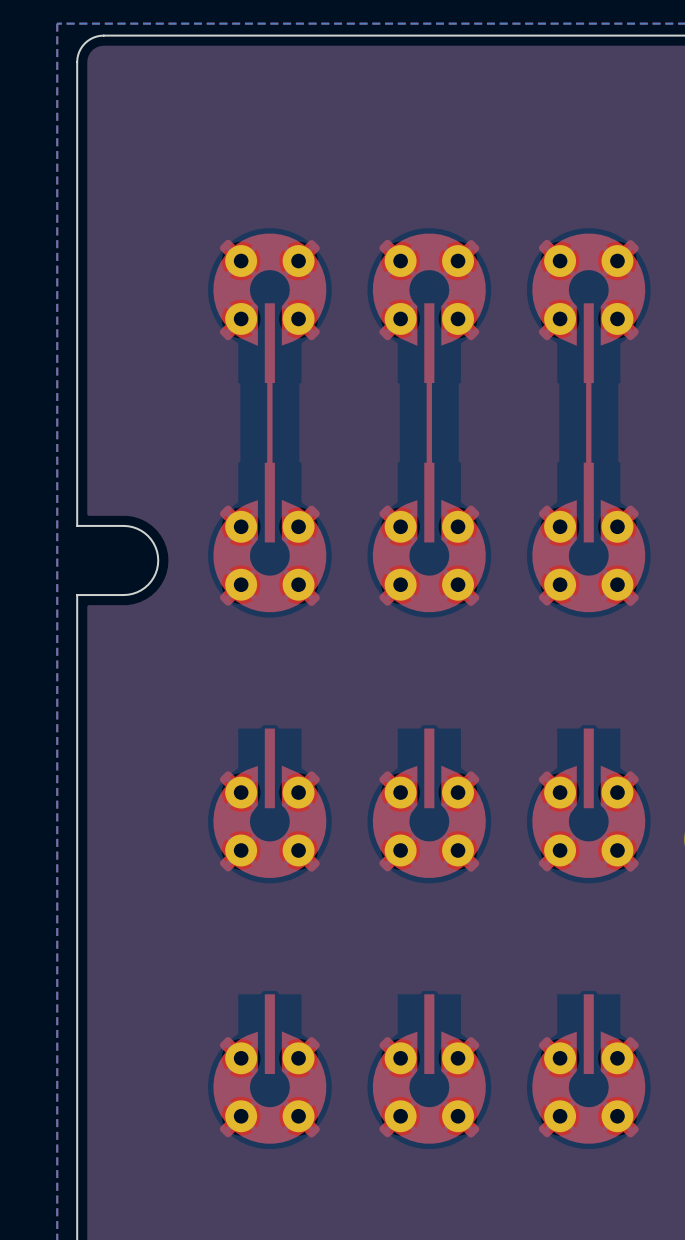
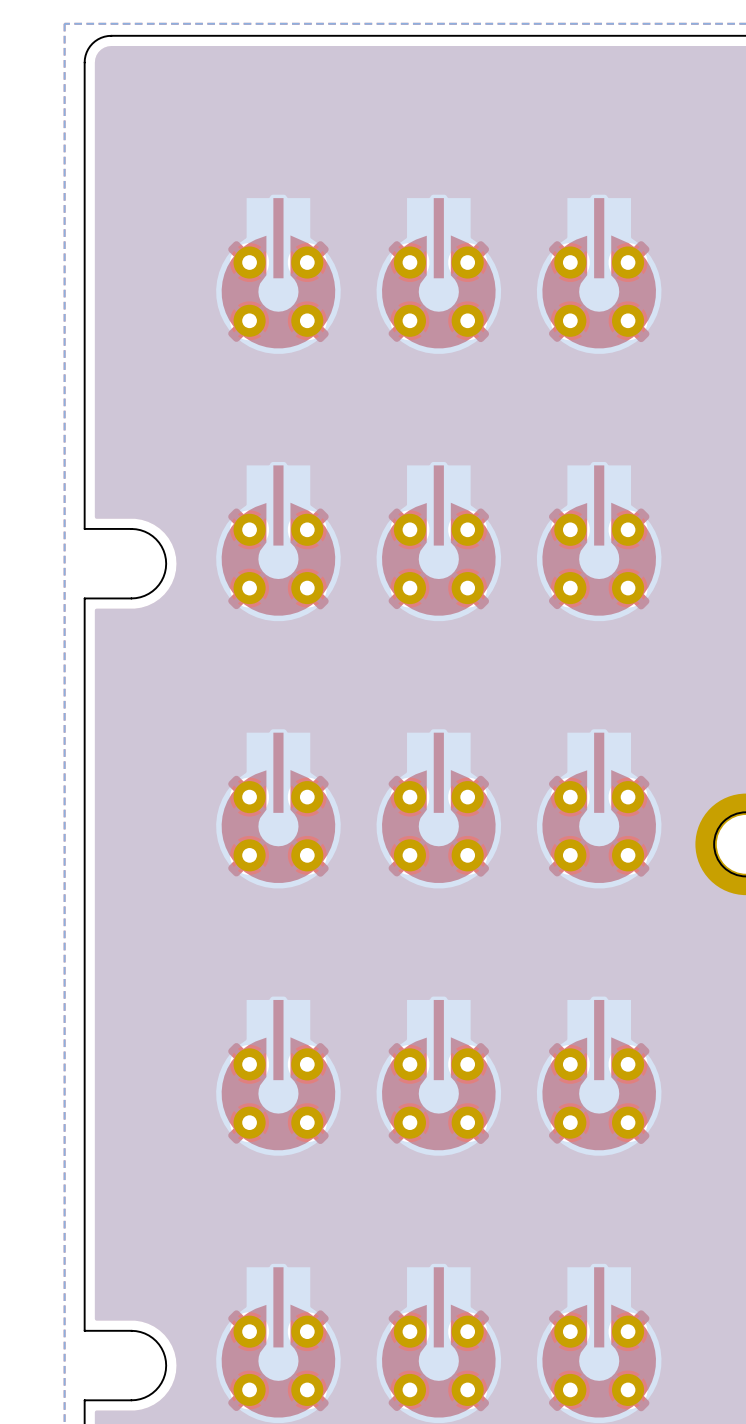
part rotation: 0° (269, 308) -> 180° (278, 273)
part rotation: 0° (429, 308) -> 180° (438, 273)
part rotation: 0° (588, 308) -> 180° (599, 273)
top track: (269, 383) (269, 462) -> none
top track: (429, 383) (429, 462) -> none
top track: (588, 383) (588, 462) -> none

